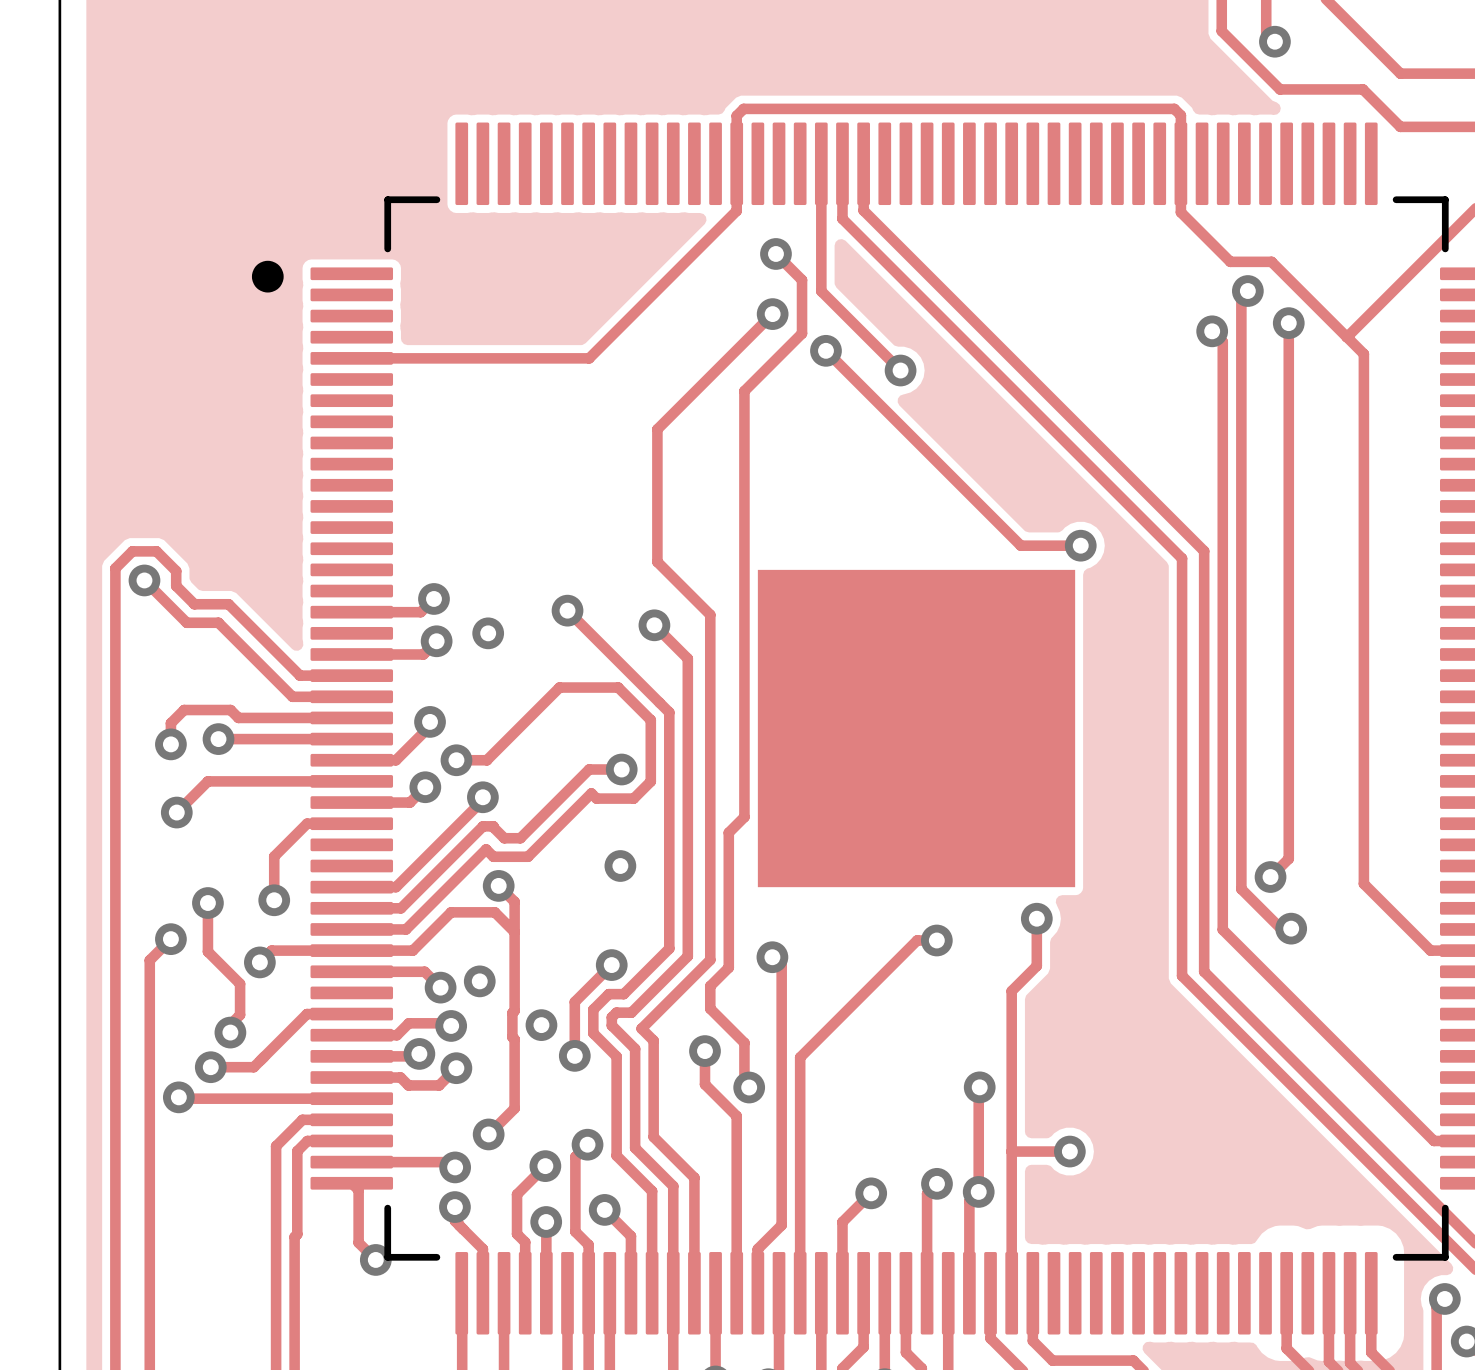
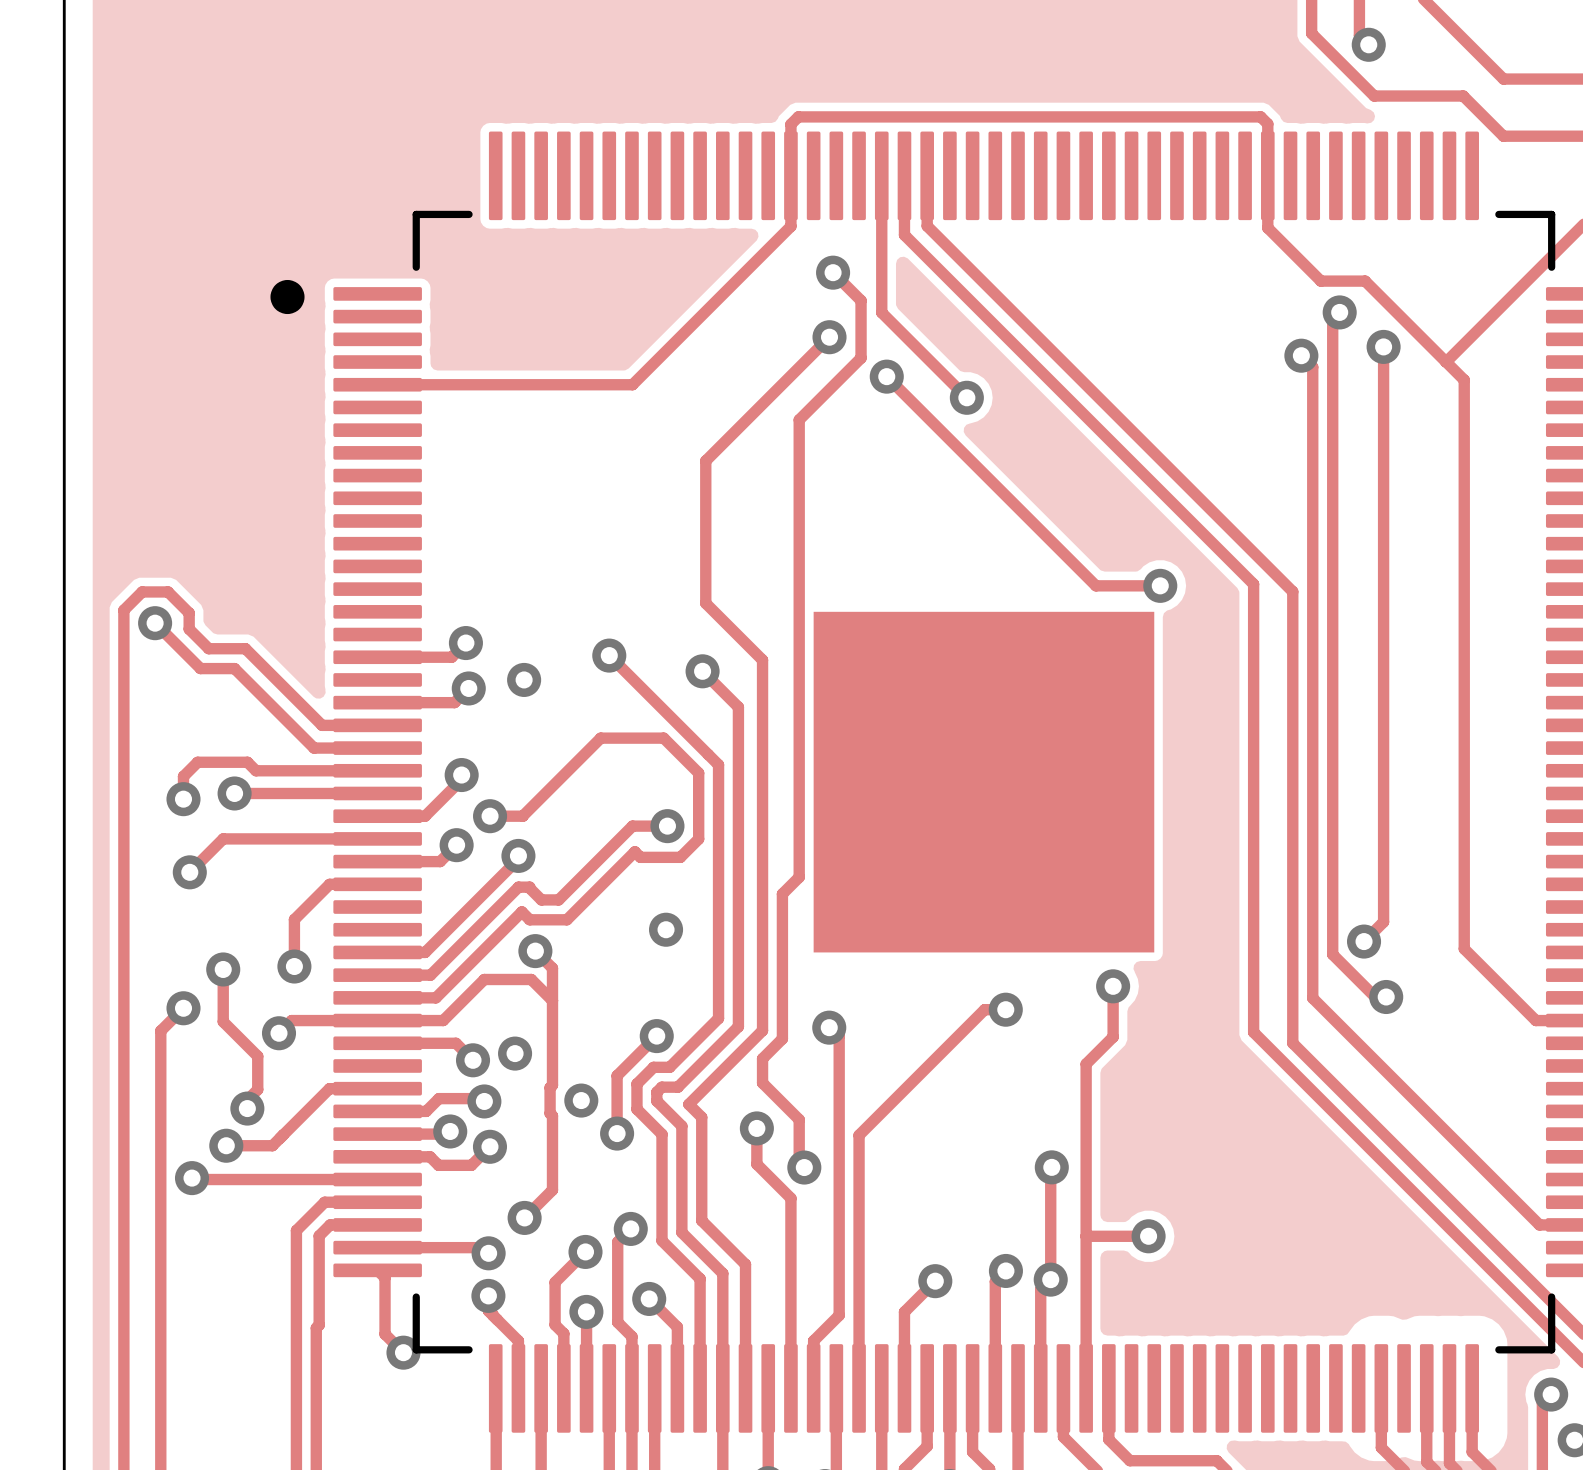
track: (1167, 544) (1182, 558) (1182, 975) -> (1253, 584) (1253, 1032) (1269, 1047)

